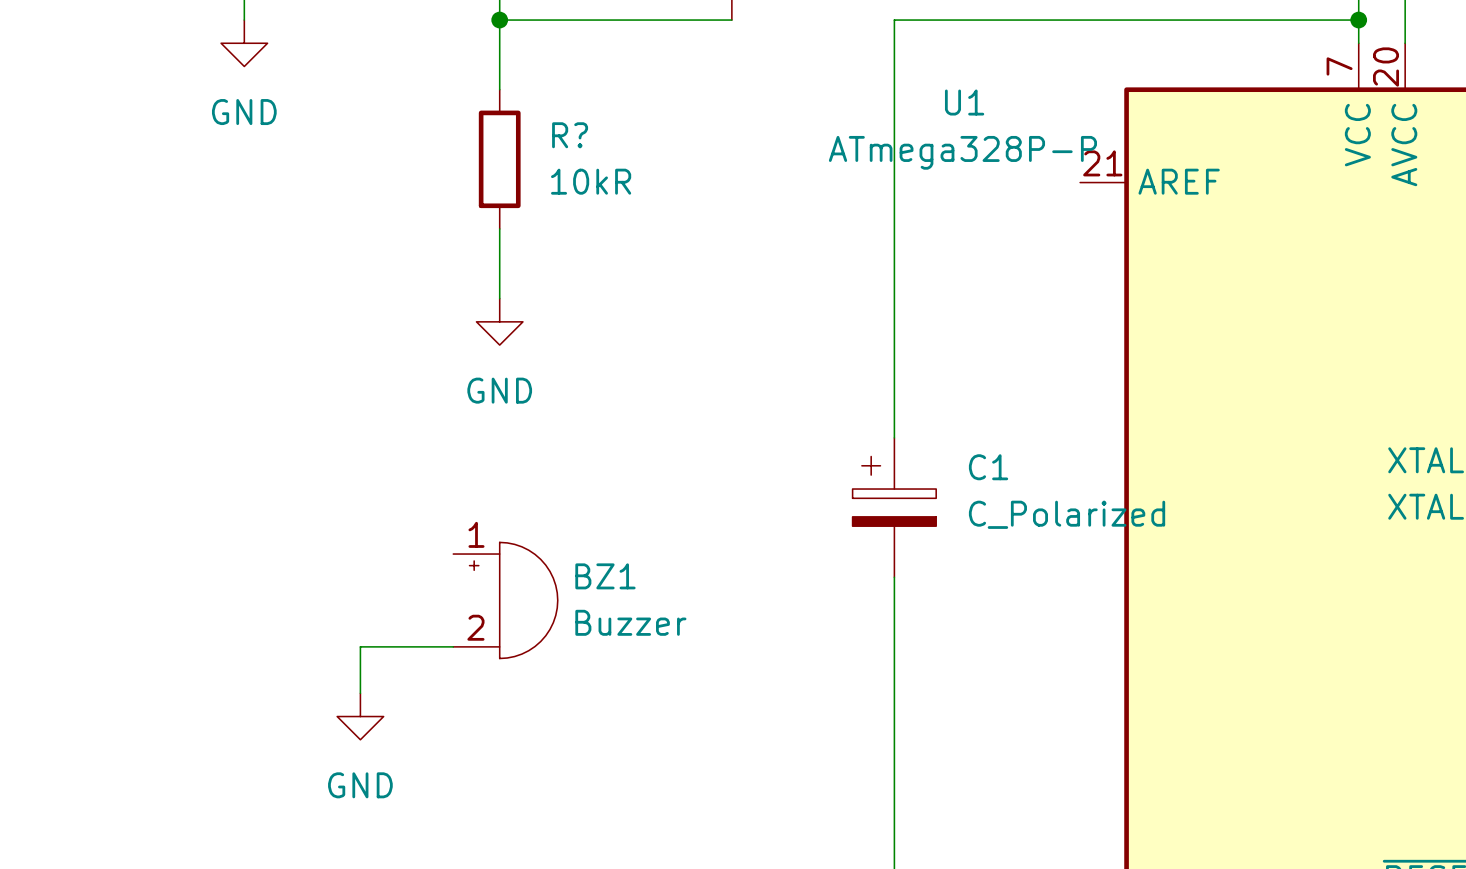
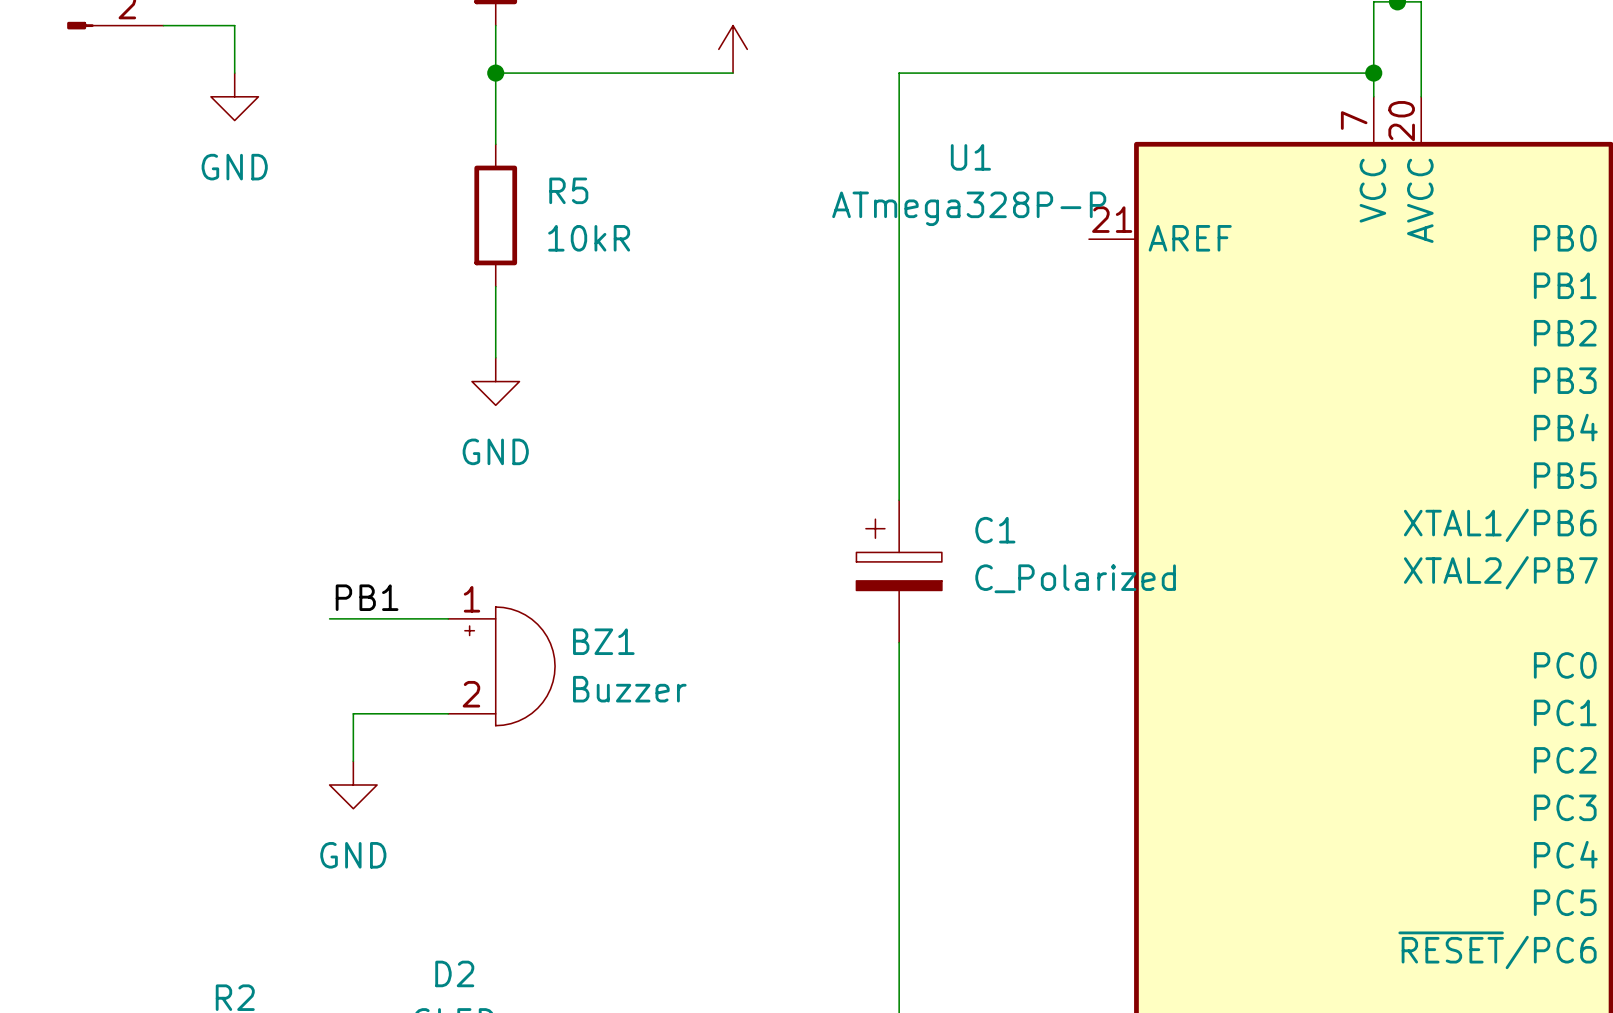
R? name: R? (570, 135) -> R5 (568, 190)
label: none -> PB1 (367, 597)
wire: none -> (329, 618) (448, 618)

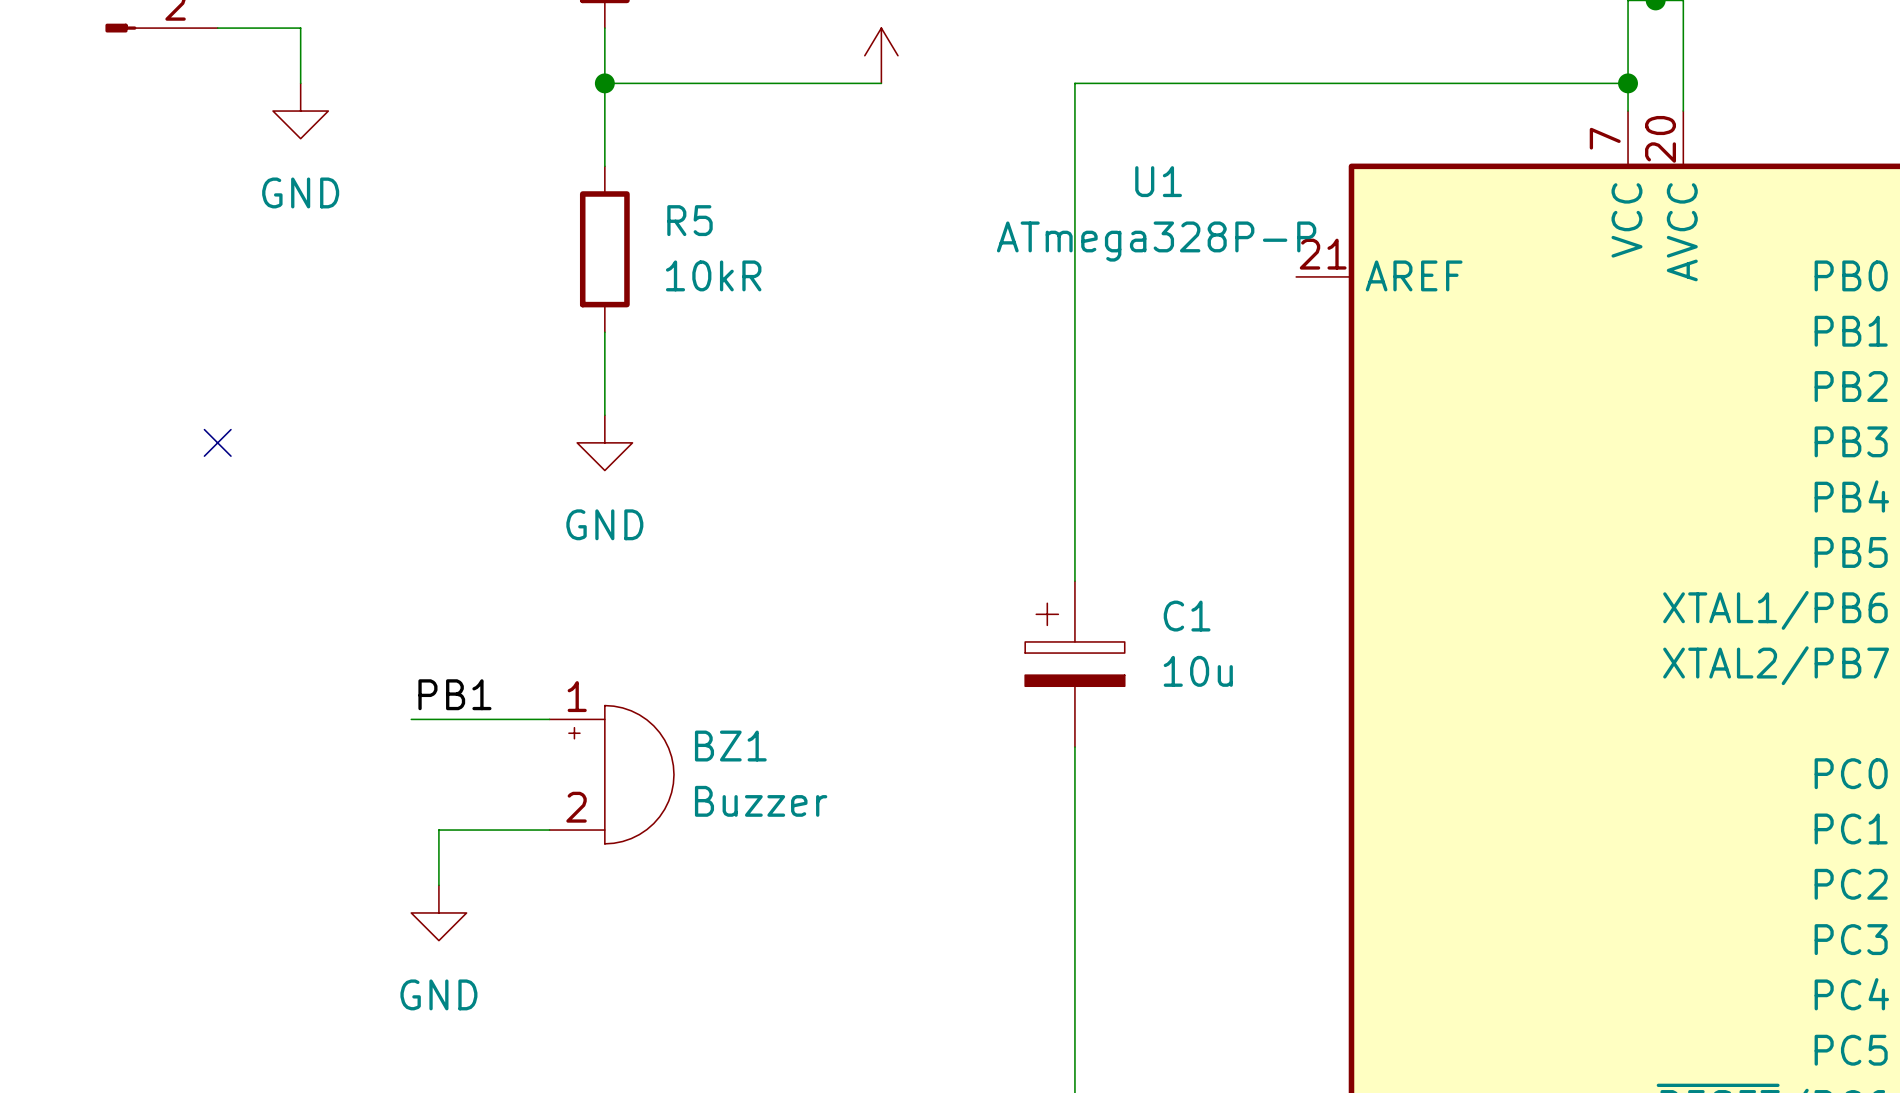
no-connect mark: none -> (217, 442)
C1 value: C_Polarized (1075, 578) -> 10u (1198, 671)

